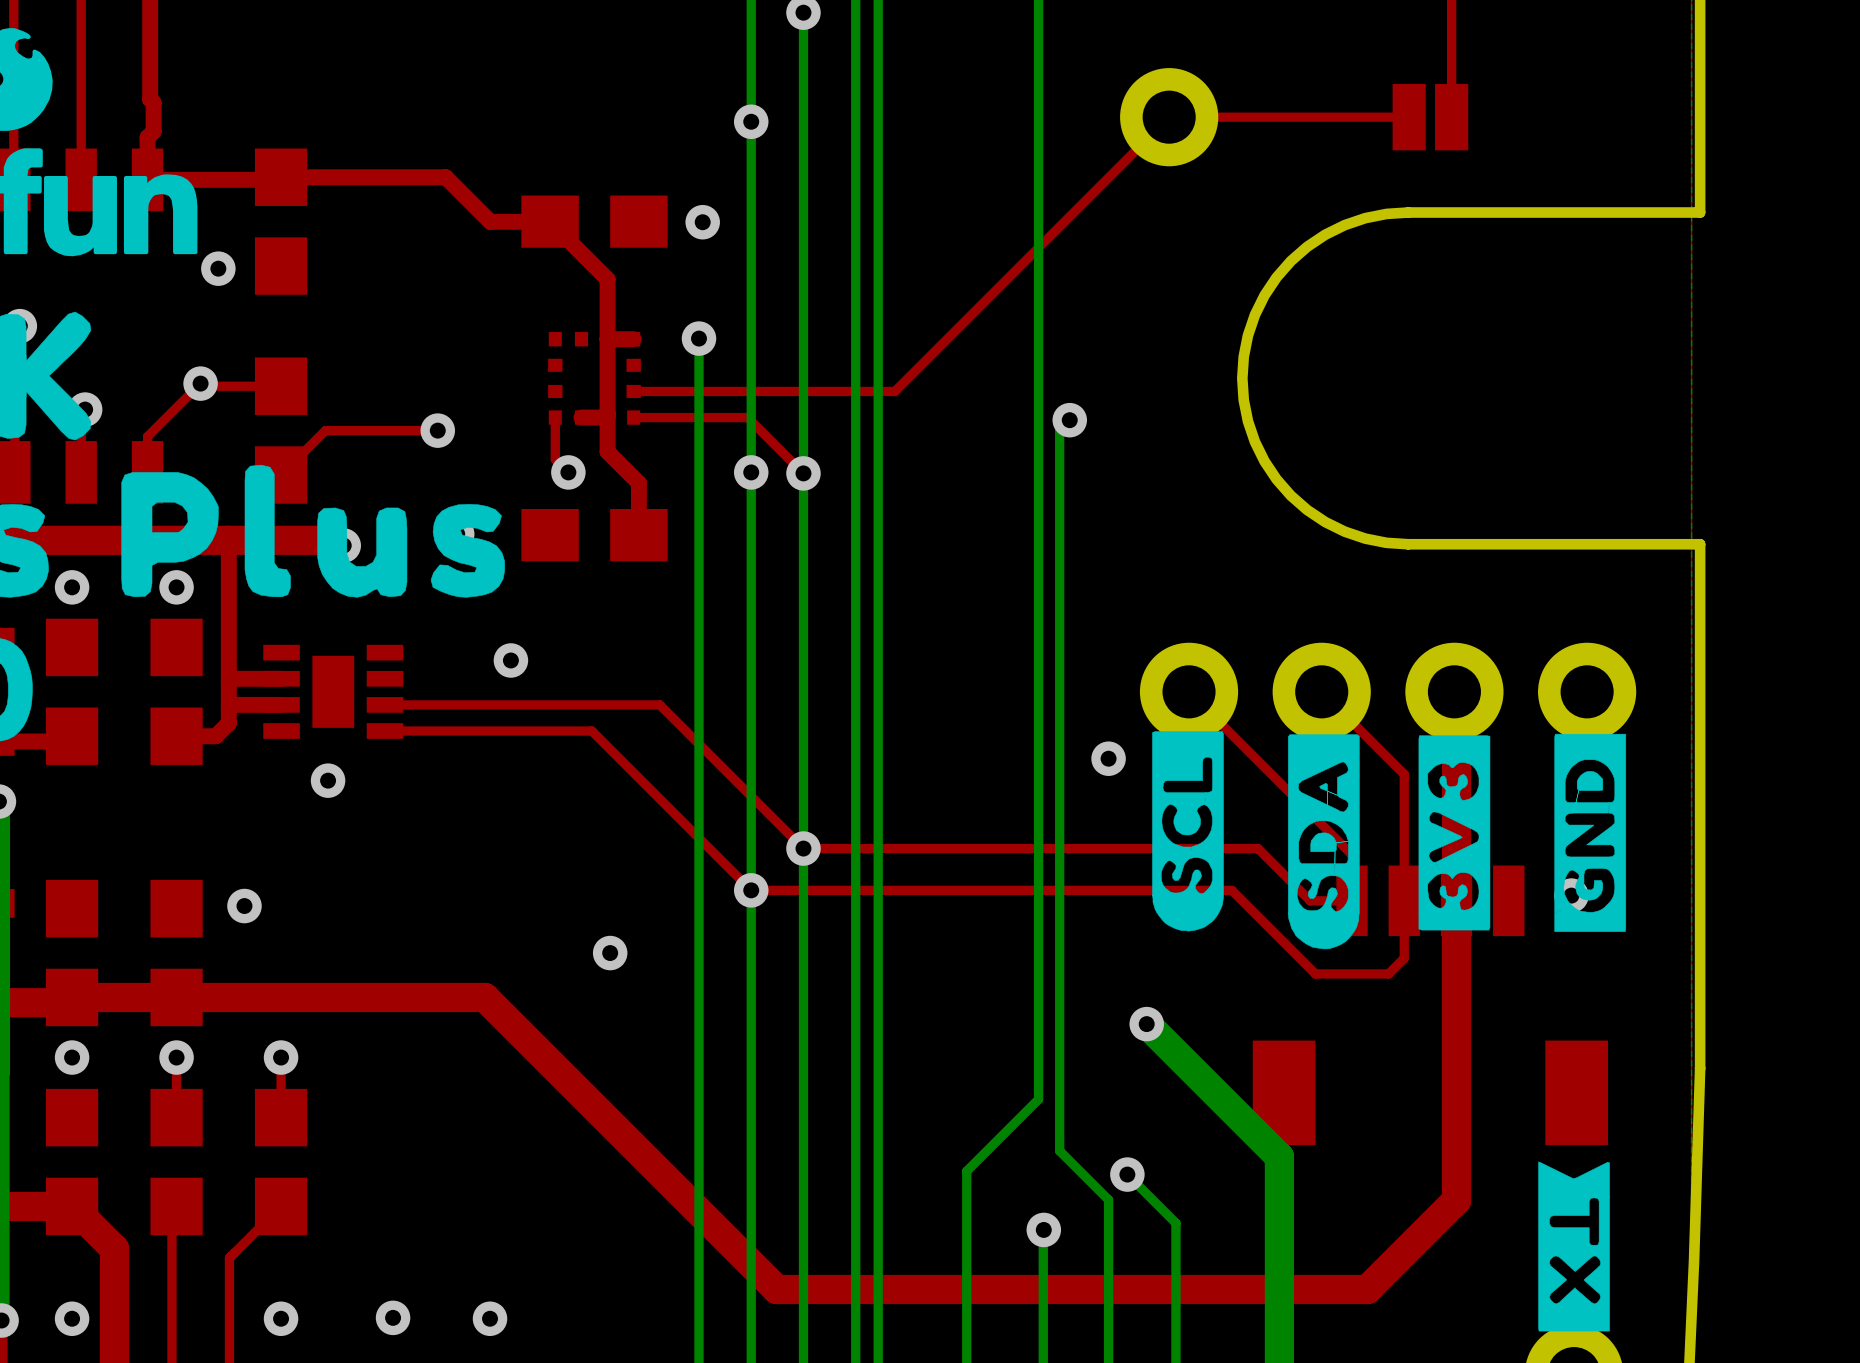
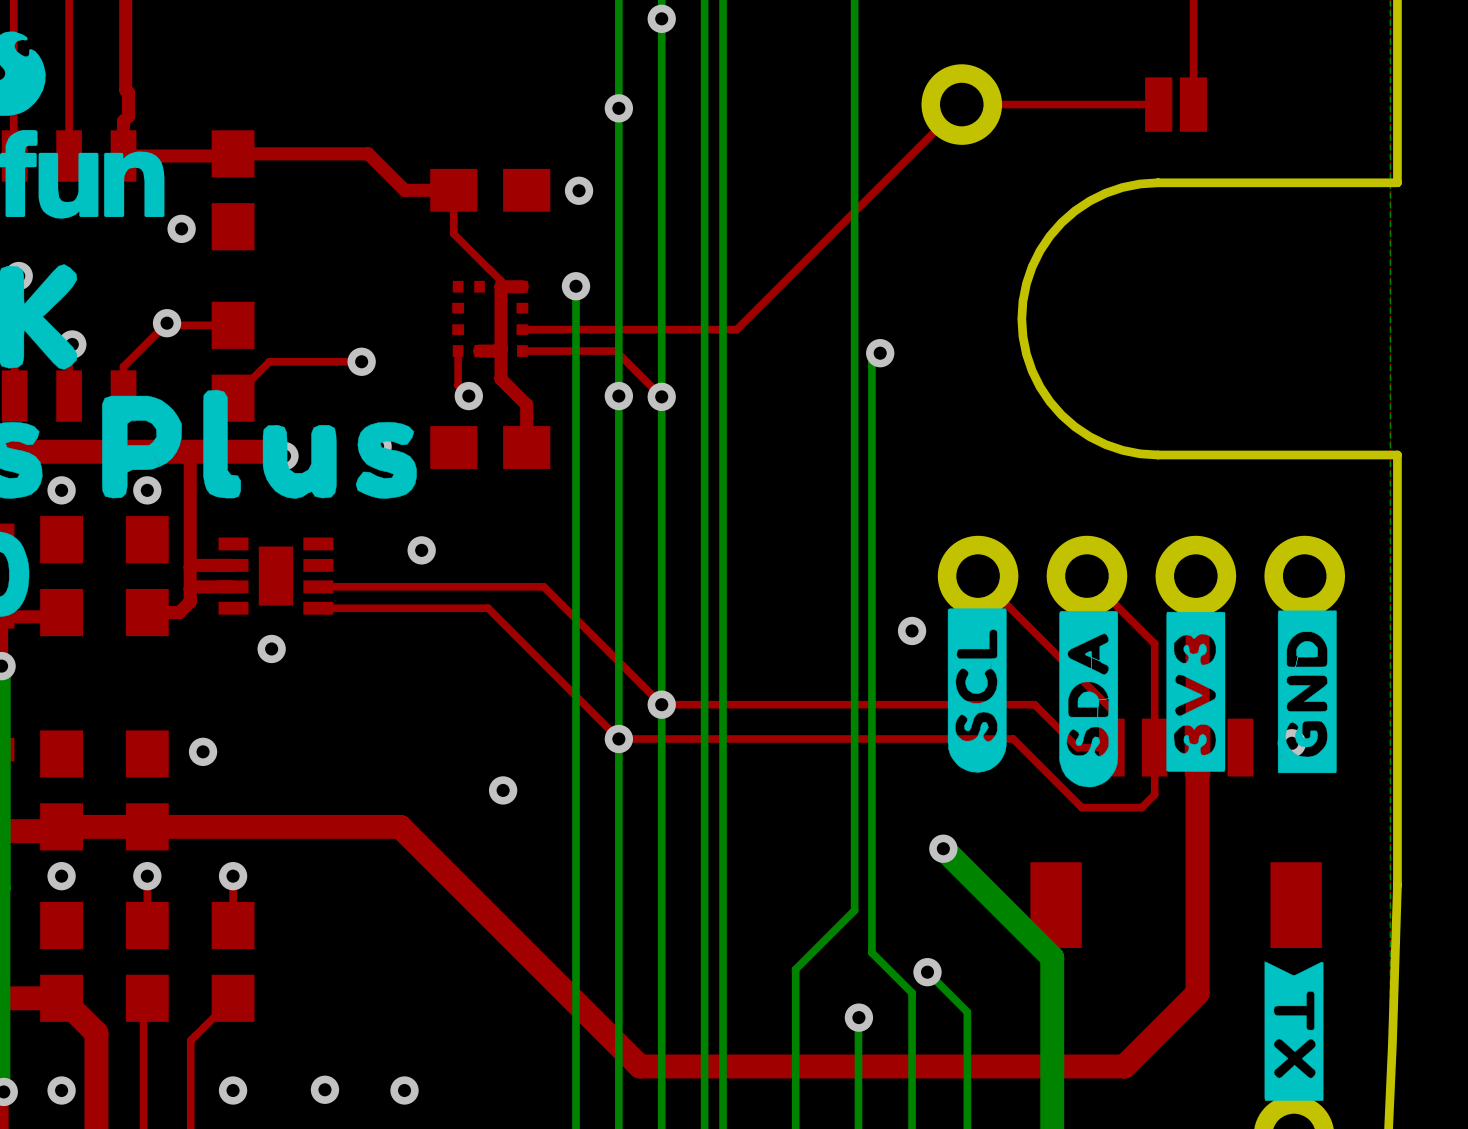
top track: (550, 221) (607, 279) (607, 331) -> (453, 190) (453, 233) (489, 269)
top track: none -> (489, 269) (500, 280)

